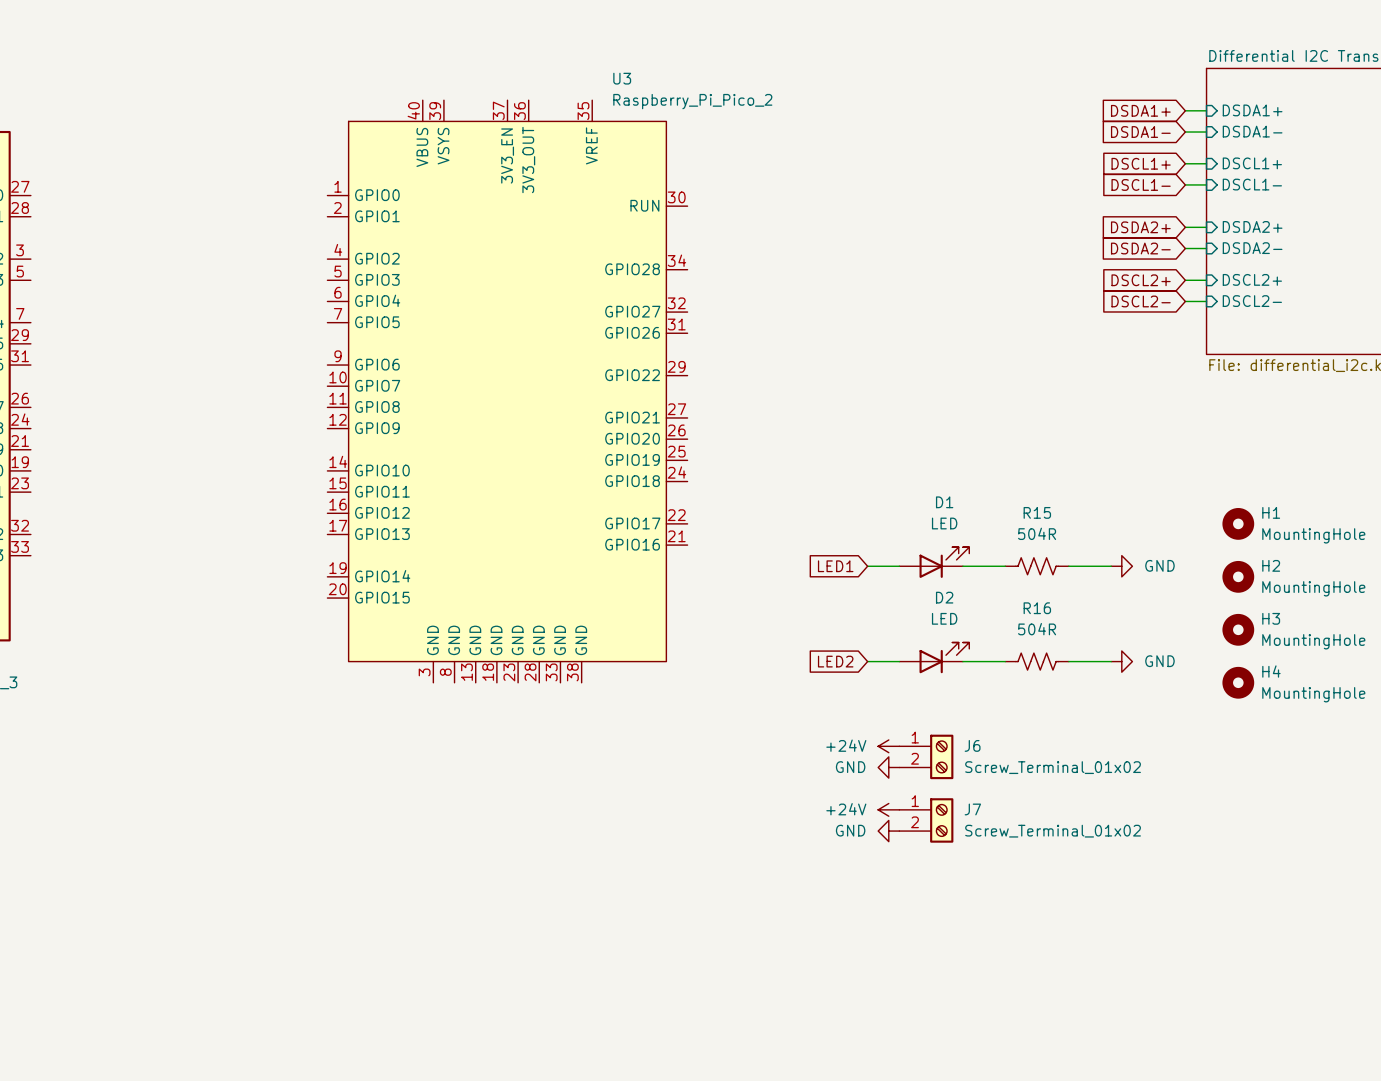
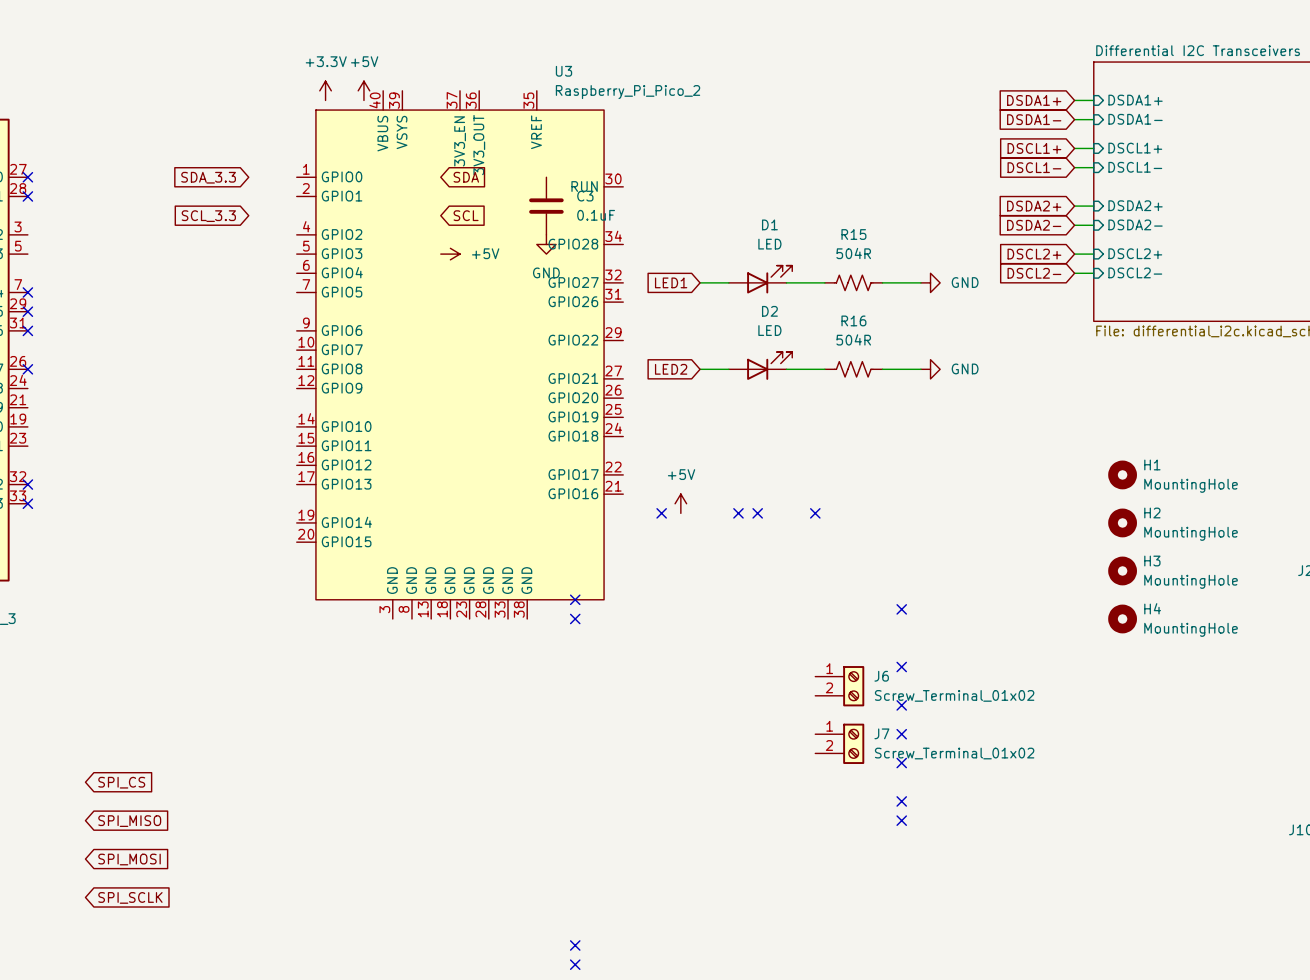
power symbol: none -> +3.3V (325, 90)
power symbol: none -> +5V (363, 90)
no-connect mark: none -> (27, 177)
global label: none -> SDA (466, 177)
global label: none -> SDA_3.3 (208, 177)
no-connect mark: none -> (27, 196)
C3: none -> 0.1uF (546, 206)
global label: none -> SCL (466, 215)
global label: none -> SCL_3.3 (208, 216)
power symbol: none -> GND (546, 244)
power symbol: none -> +5V (450, 254)
global label: none -> LED1 (671, 282)
wire: none -> (700, 282) (728, 282)
wire: none -> (786, 282) (824, 282)
wire: none -> (882, 282) (920, 282)
power symbol: none -> GND (930, 282)
no-connect mark: none -> (27, 292)
no-connect mark: none -> (27, 311)
no-connect mark: none -> (27, 330)
no-connect mark: none -> (27, 369)
global label: none -> LED2 (671, 369)
power symbol: none -> GND (930, 369)
no-connect mark: none -> (27, 484)
no-connect mark: none -> (27, 503)
power symbol: none -> +5V (680, 503)
D1 position: (934, 562) -> (760, 279)
no-connect mark: none -> (661, 513)
no-connect mark: none -> (738, 513)
global label: LED1 (835, 566) -> none
no-connect mark: none -> (757, 513)
wire: (867, 566) (899, 566) -> (700, 369) (728, 369)
no-connect mark: none -> (815, 513)
wire: (962, 566) (1005, 566) -> (786, 369) (824, 369)
R15 position: (1037, 566) -> (853, 282)
wire: (1068, 566) (1111, 566) -> (882, 369) (920, 369)
power symbol: GND (1121, 566) -> none
D2 position: (934, 657) -> (760, 365)
no-connect mark: none -> (575, 599)
global label: LED2 (835, 661) -> none
wire: (867, 661) (899, 661) -> none
wire: (962, 661) (1005, 661) -> none
R16 position: (1037, 661) -> (853, 369)
wire: (1068, 661) (1111, 661) -> none
power symbol: GND (1121, 661) -> none
no-connect mark: none -> (901, 609)
no-connect mark: none -> (575, 618)
no-connect mark: none -> (901, 667)
power symbol: +24V (888, 746) -> none
power symbol: GND (888, 767) -> none
no-connect mark: none -> (901, 705)
power symbol: +24V (888, 809) -> none
no-connect mark: none -> (901, 734)
power symbol: GND (888, 831) -> none
no-connect mark: none -> (901, 763)
global label: none -> SPI_CS (121, 782)
no-connect mark: none -> (901, 801)
global label: none -> SPI_MISO (129, 821)
no-connect mark: none -> (901, 820)
global label: none -> SPI_MOSI (129, 859)
global label: none -> SPI_SCLK (130, 897)
no-connect mark: none -> (575, 945)
no-connect mark: none -> (575, 964)

